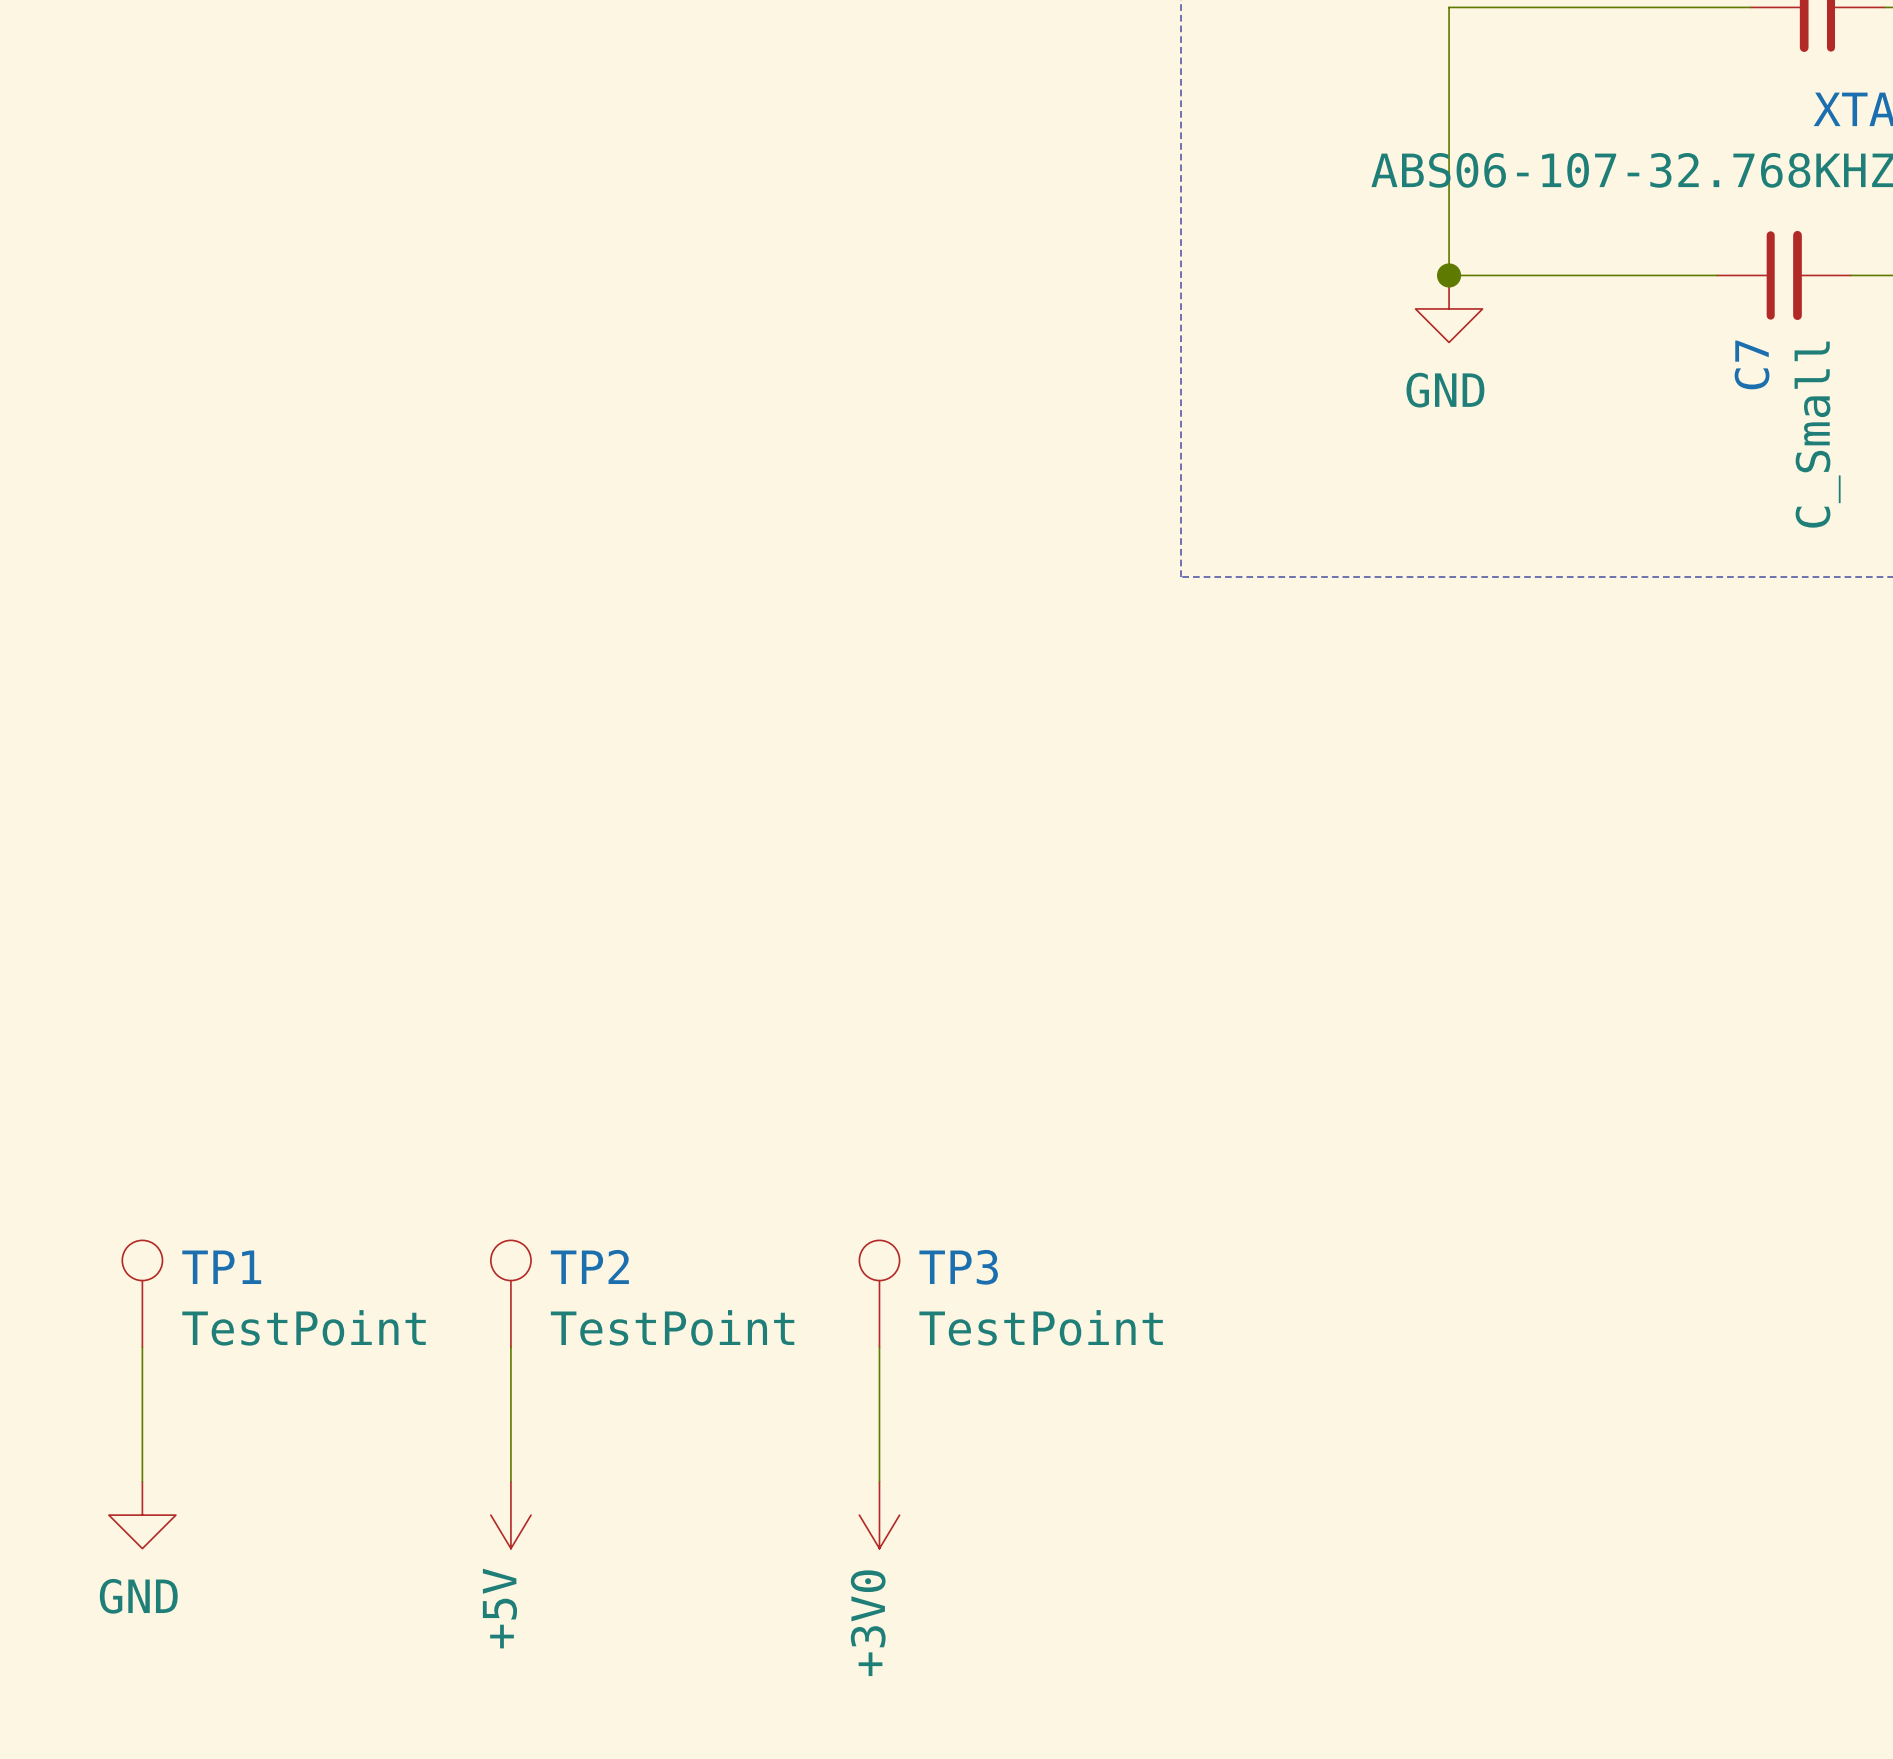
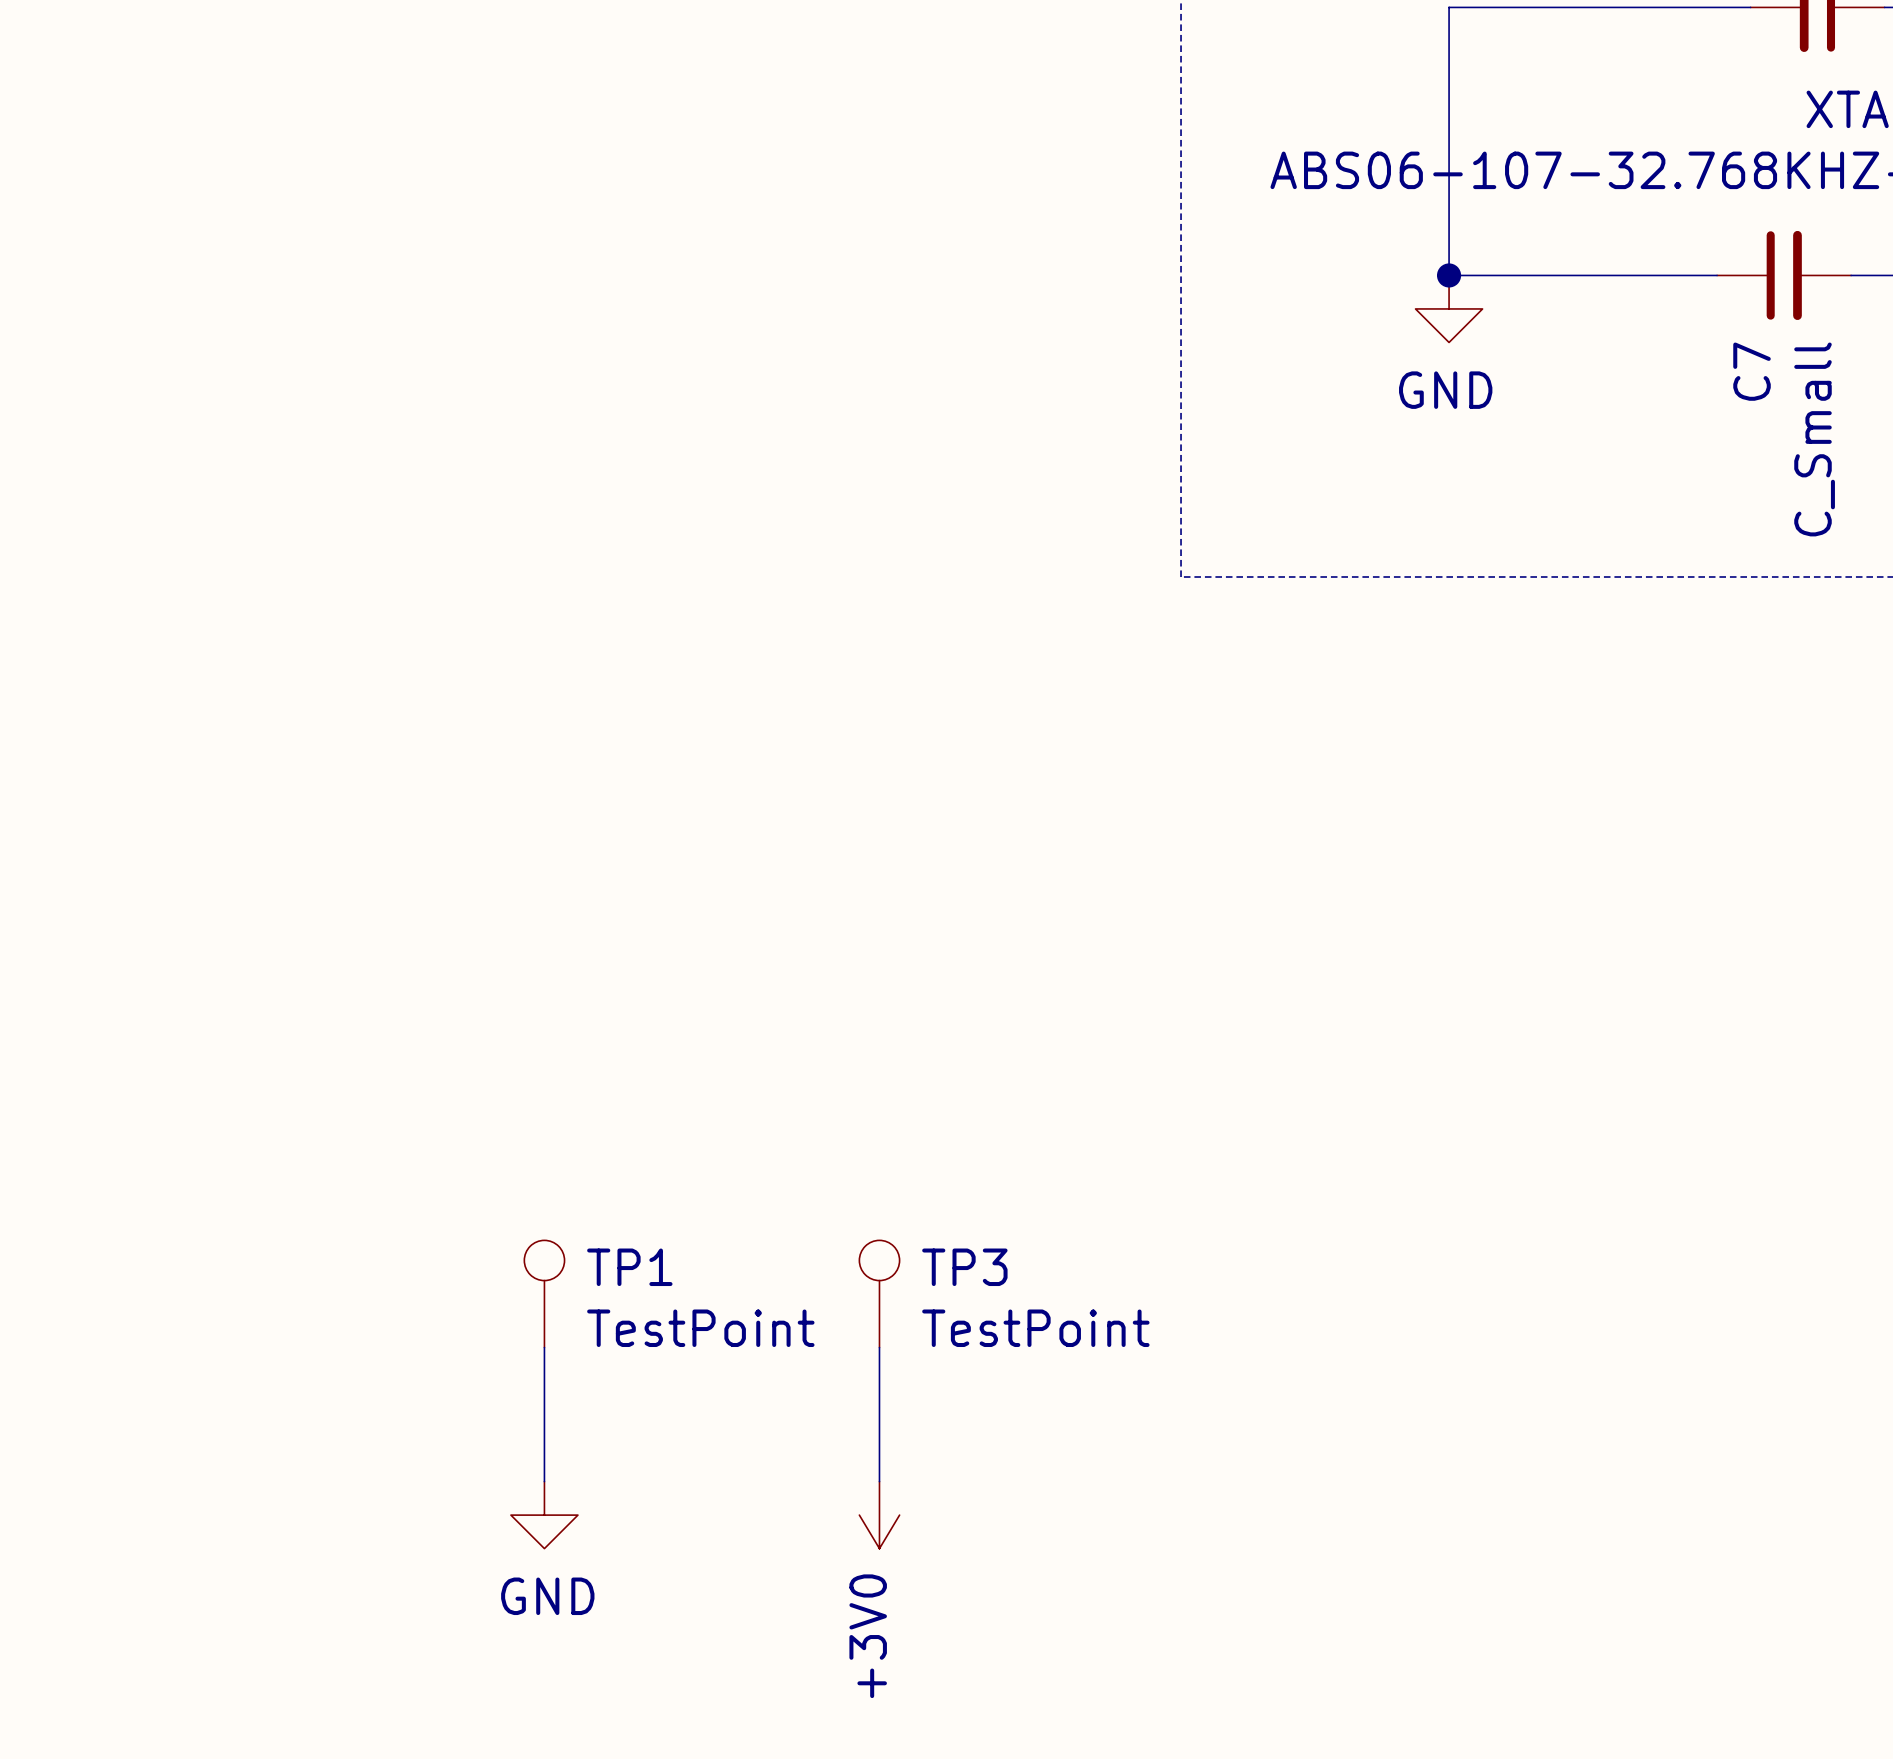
TP1 position: (142, 1293) -> (544, 1293)
TP2: TestPoint (510, 1293) -> none
wire: (142, 1347) (142, 1481) -> none
wire: (510, 1347) (510, 1481) -> (544, 1347) (544, 1481)
power symbol position: GND (142, 1515) -> GND (544, 1515)
power symbol: +5V (510, 1515) -> none
power symbol text position: GND (138, 1596) -> GND (547, 1596)

